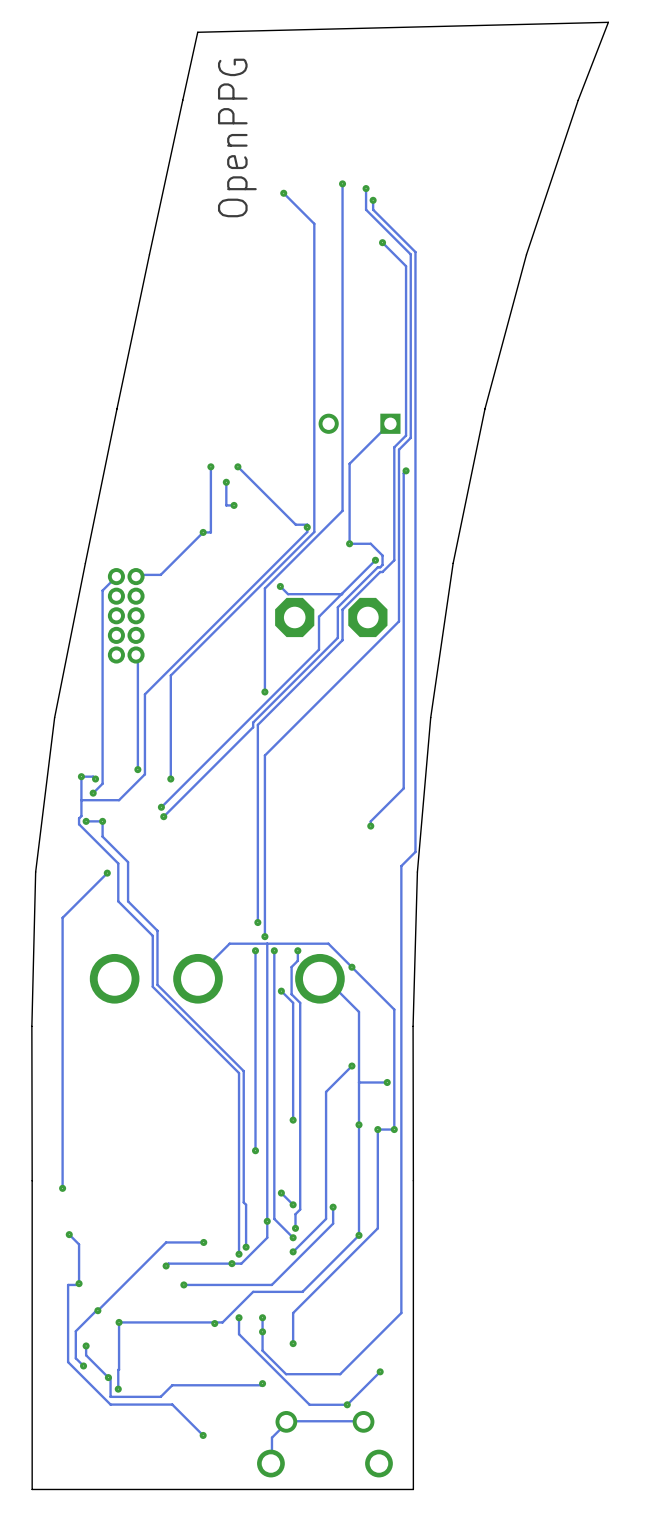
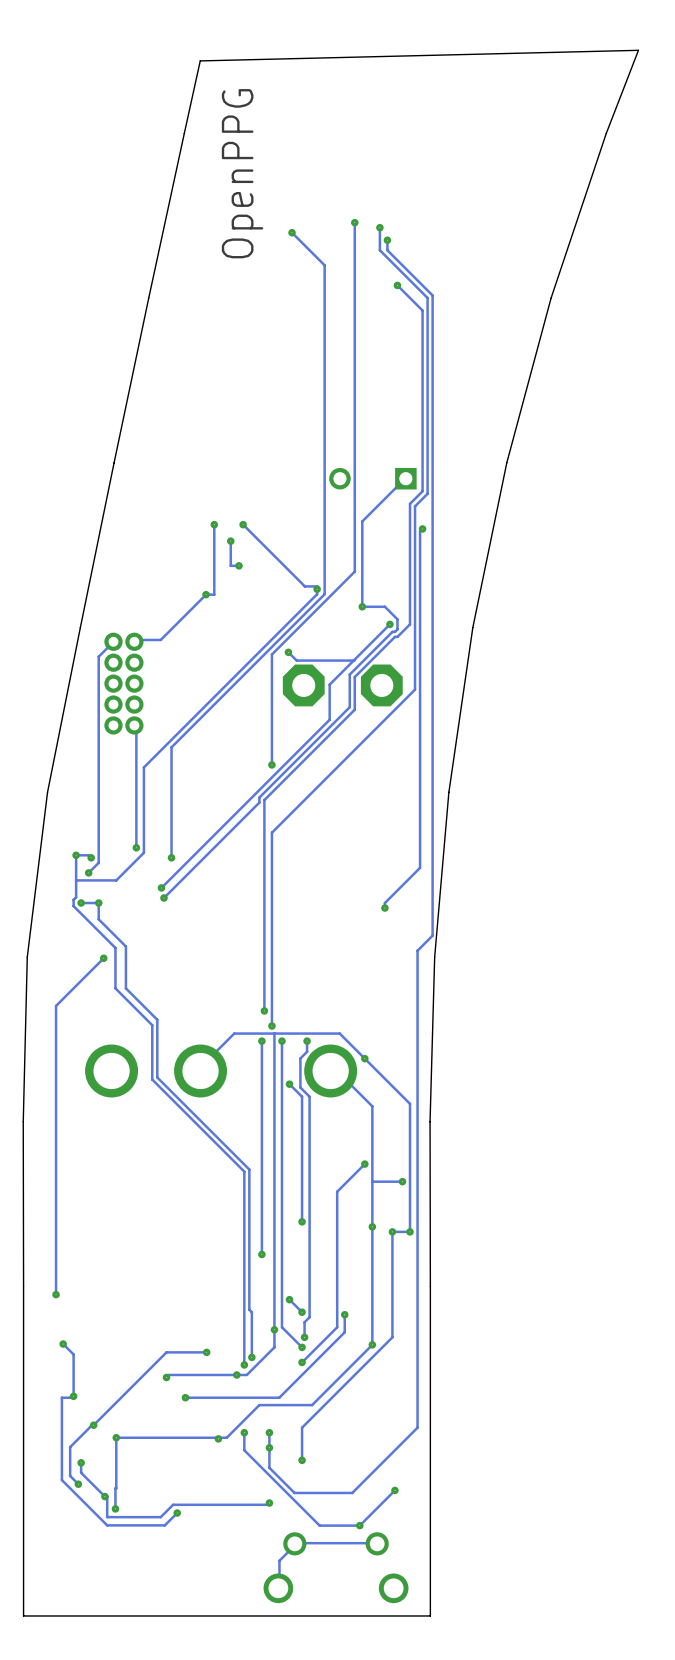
track: (164, 1404) (172, 1404) (203, 1435) -> (164, 1525) (177, 1513)
via position: (203, 1435) -> (177, 1513)

